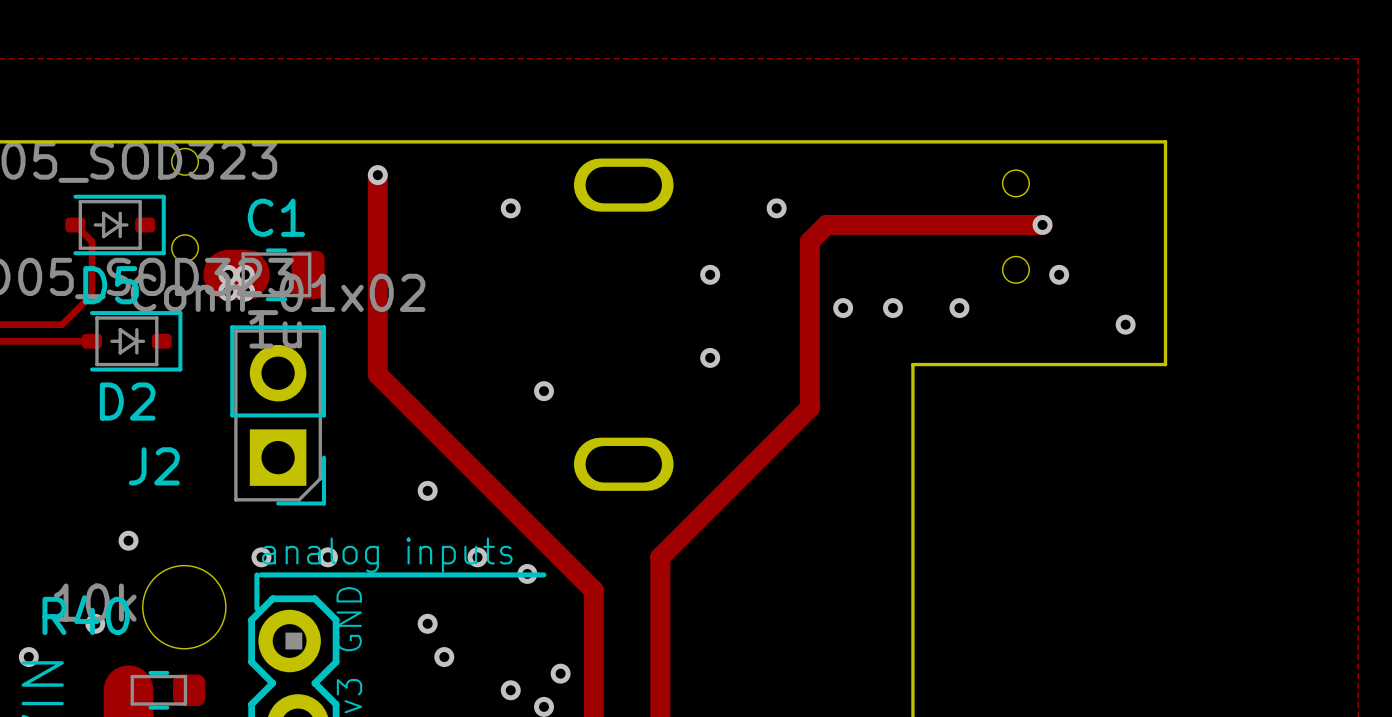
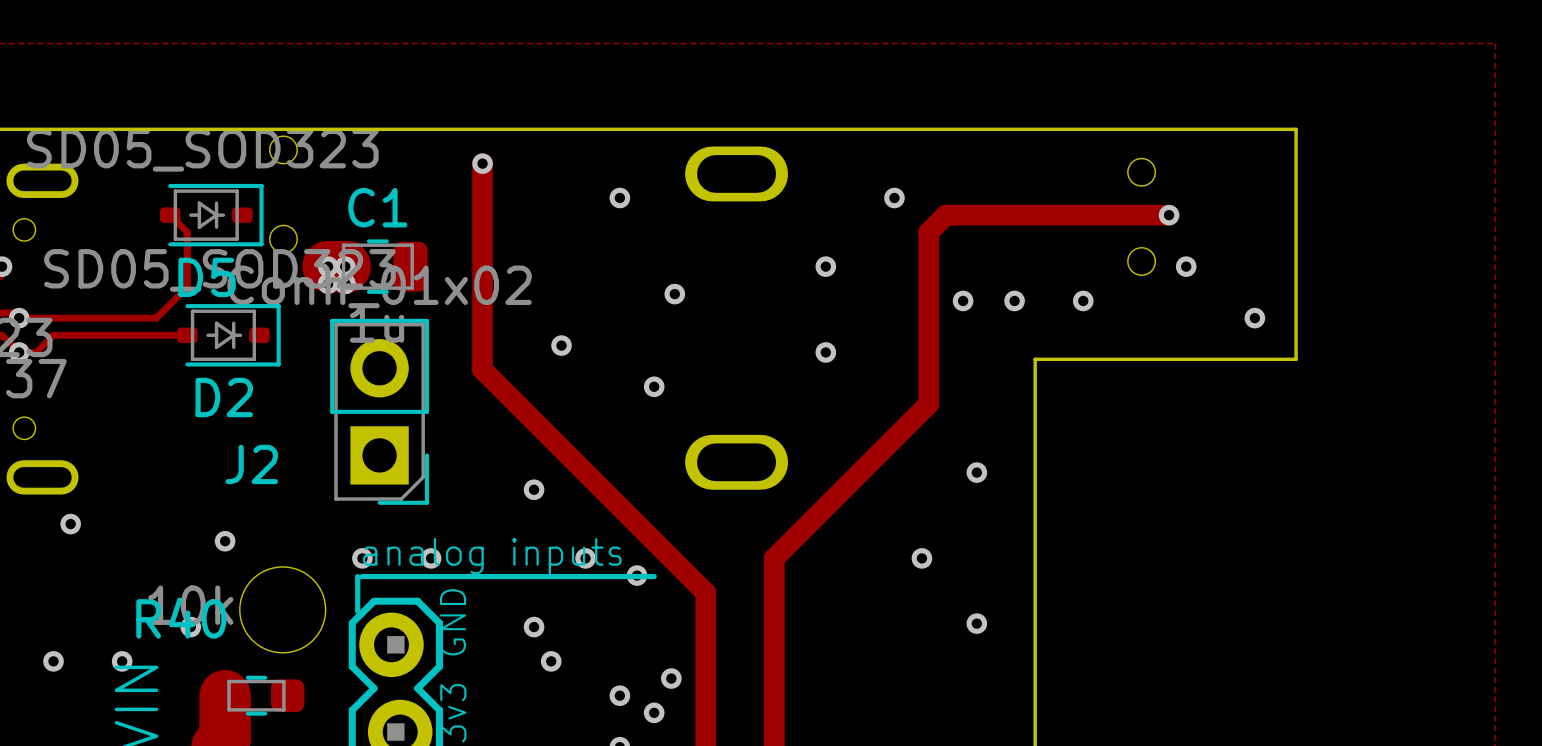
via: none -> (674, 294)
via: none -> (561, 345)
via: none -> (976, 472)
via: none -> (921, 558)
via: none -> (976, 623)

